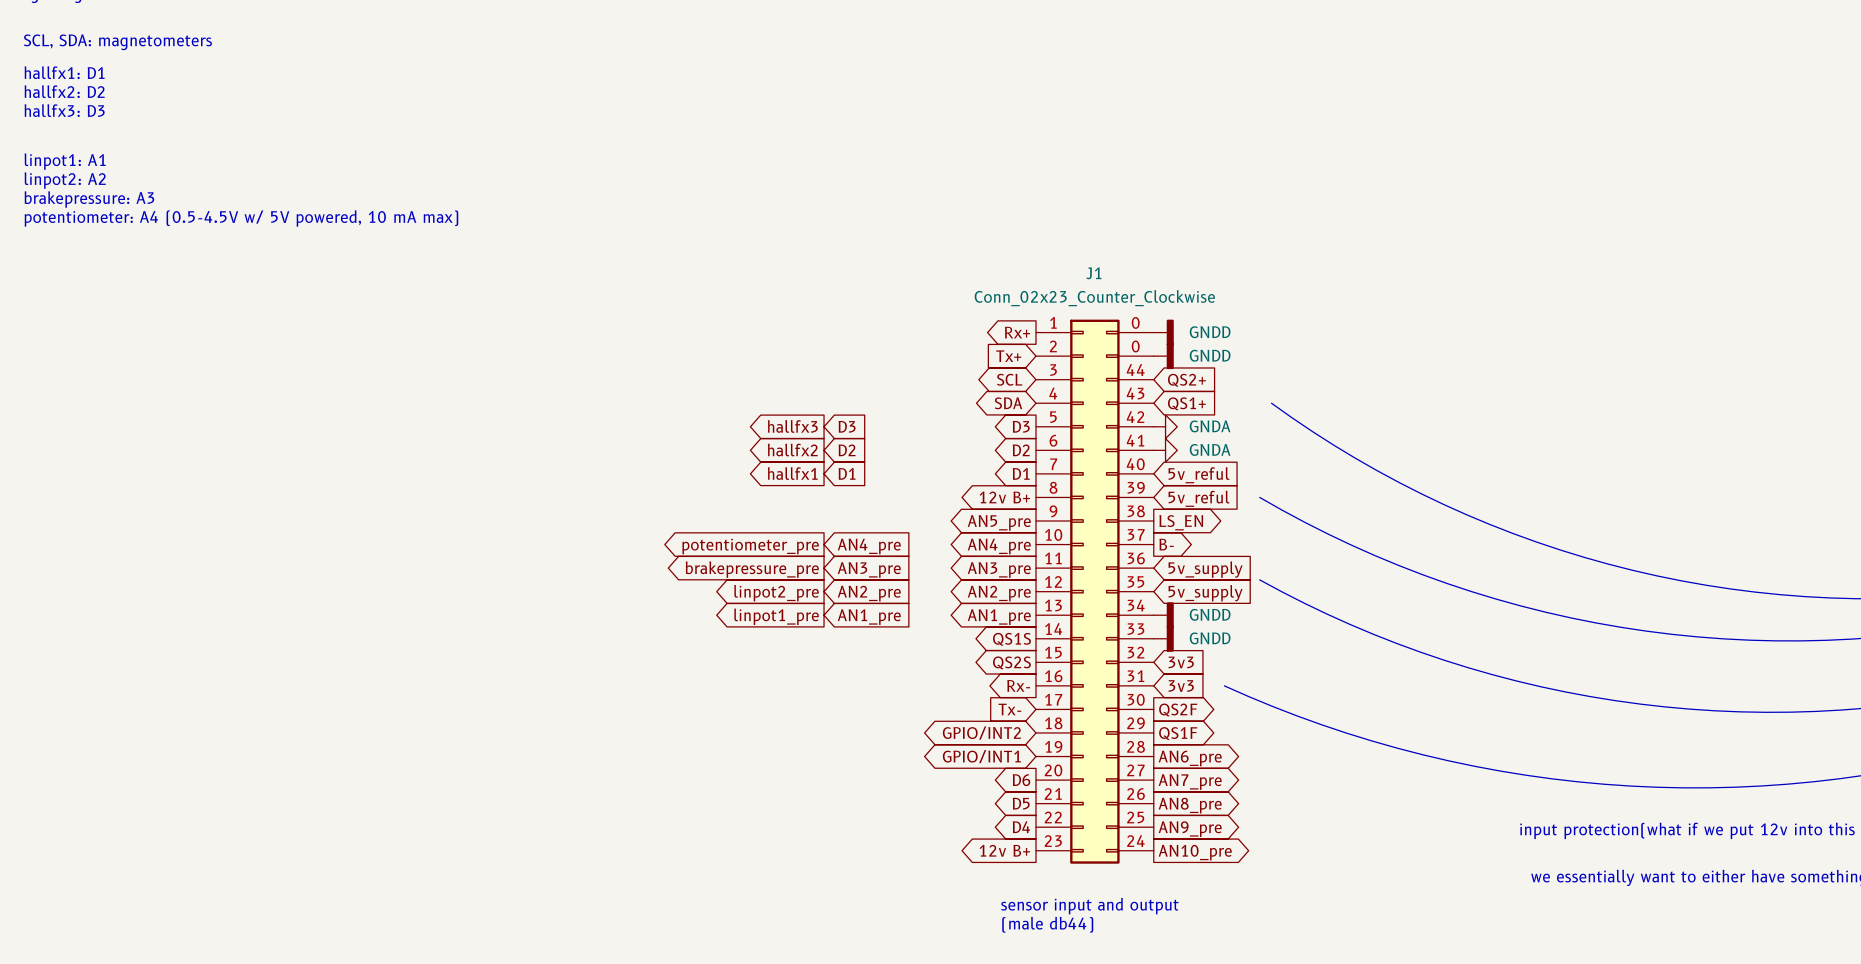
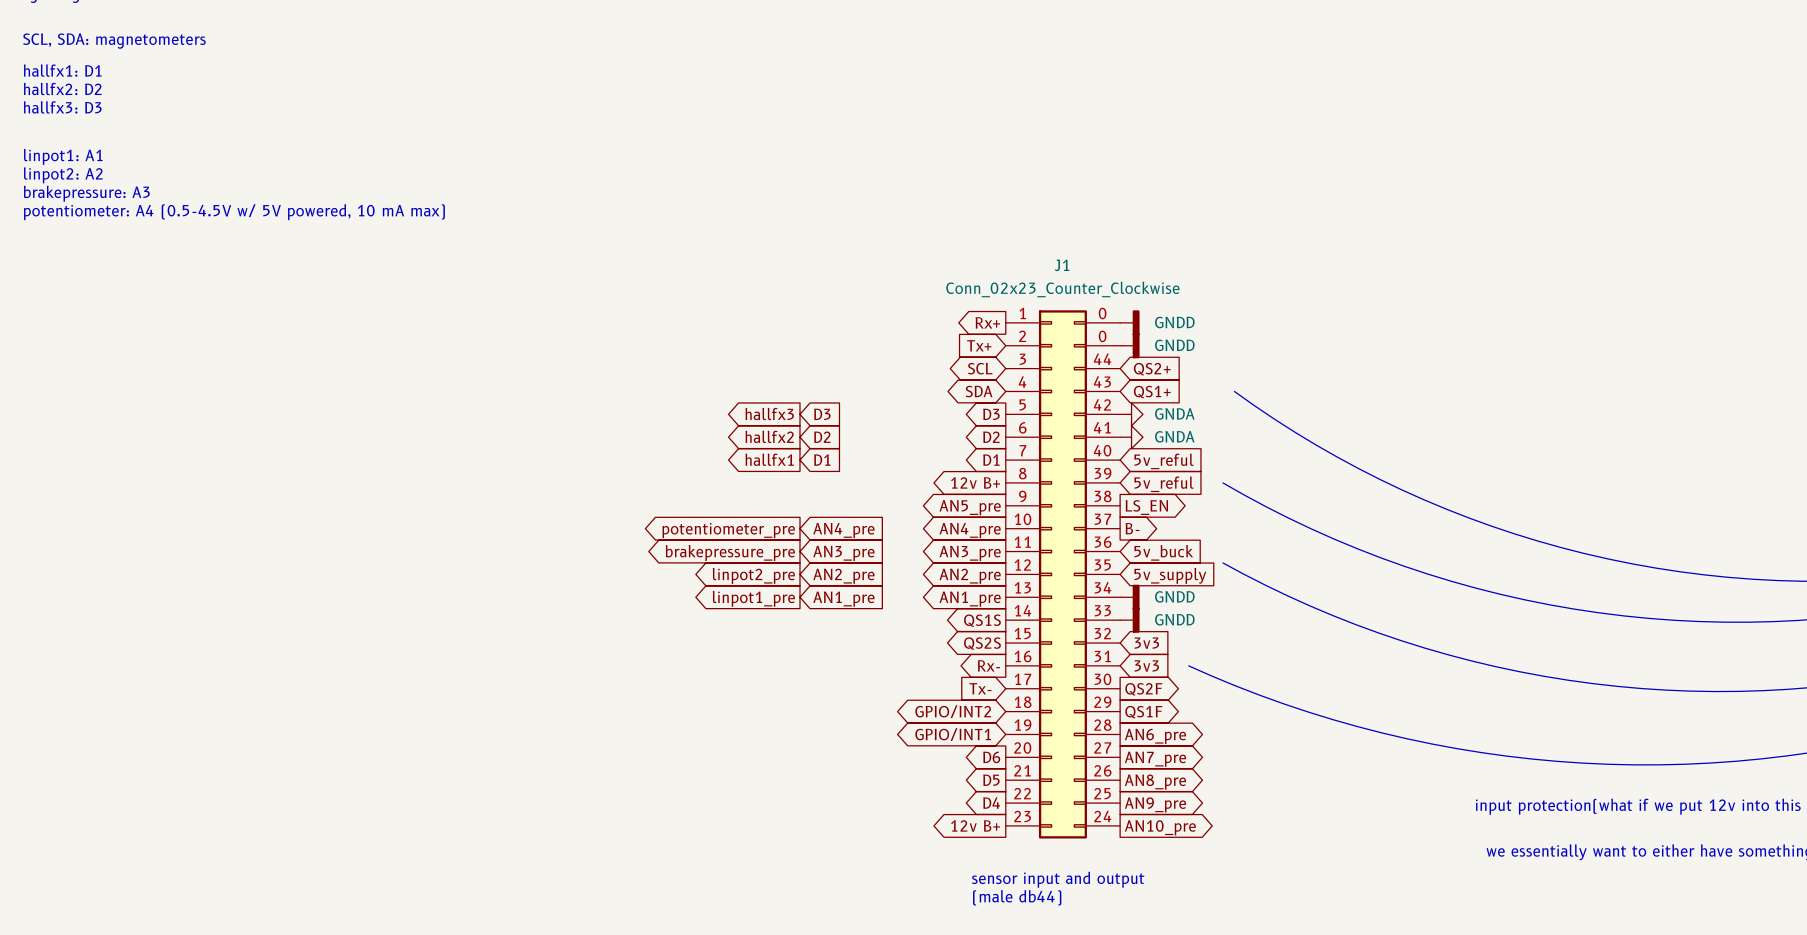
global label: 5v_supply (1205, 569) -> 5v_buck (1163, 552)

